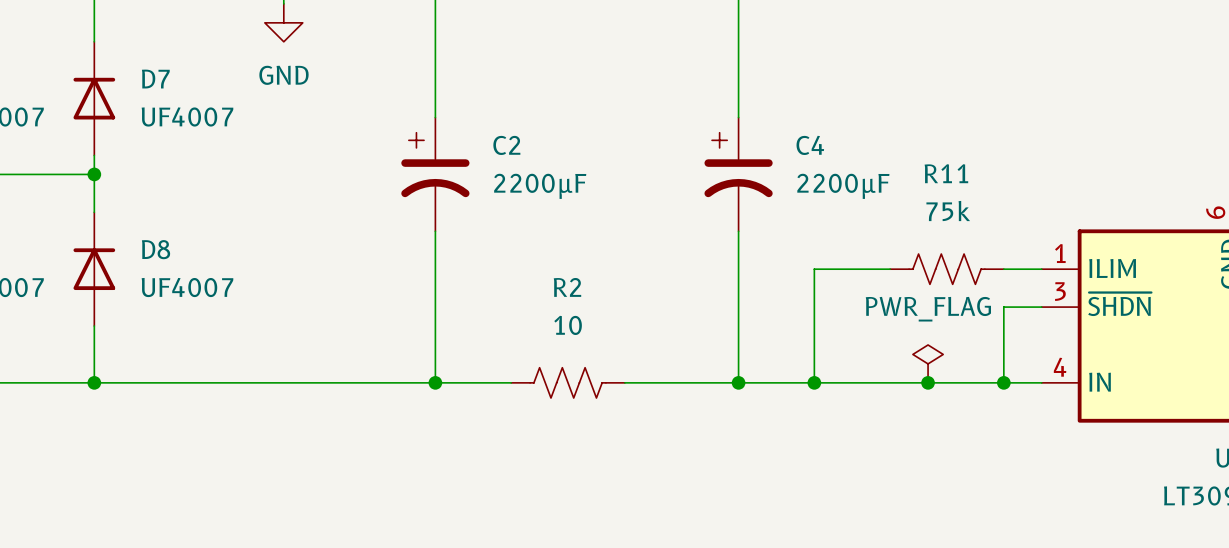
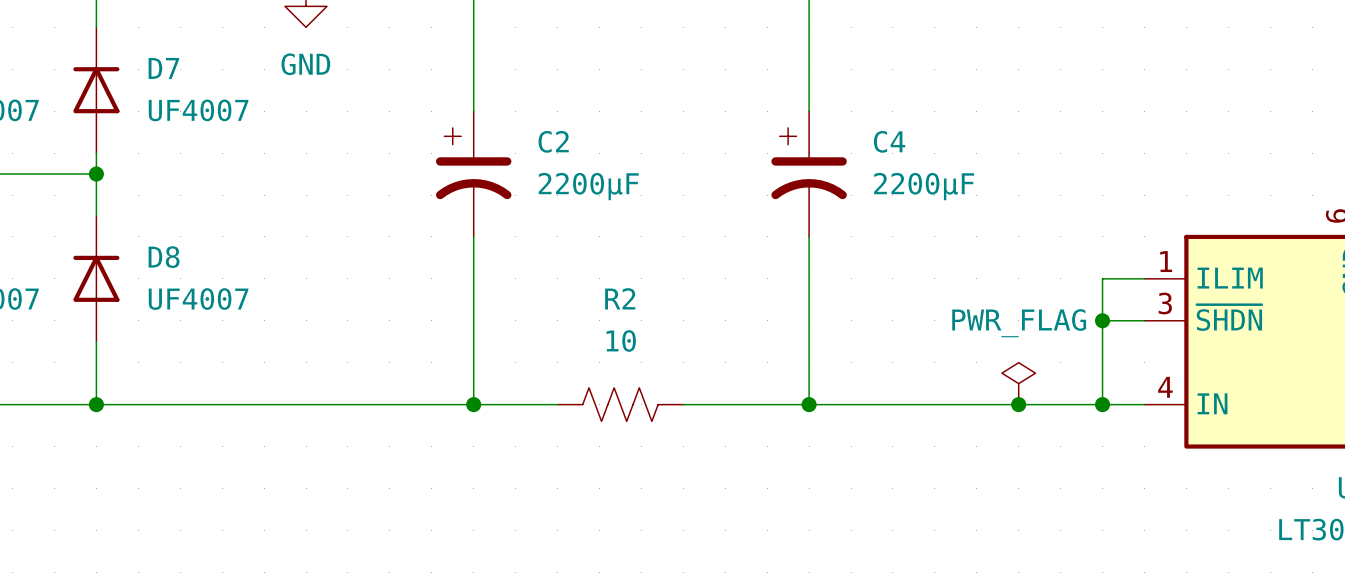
wire: (890, 269) (814, 269) (814, 382) -> none
R11: 75k (947, 269) -> none
wire: none -> (1102, 278) (1102, 320)
junction: none -> (1102, 320)
junction: (814, 382) -> none

